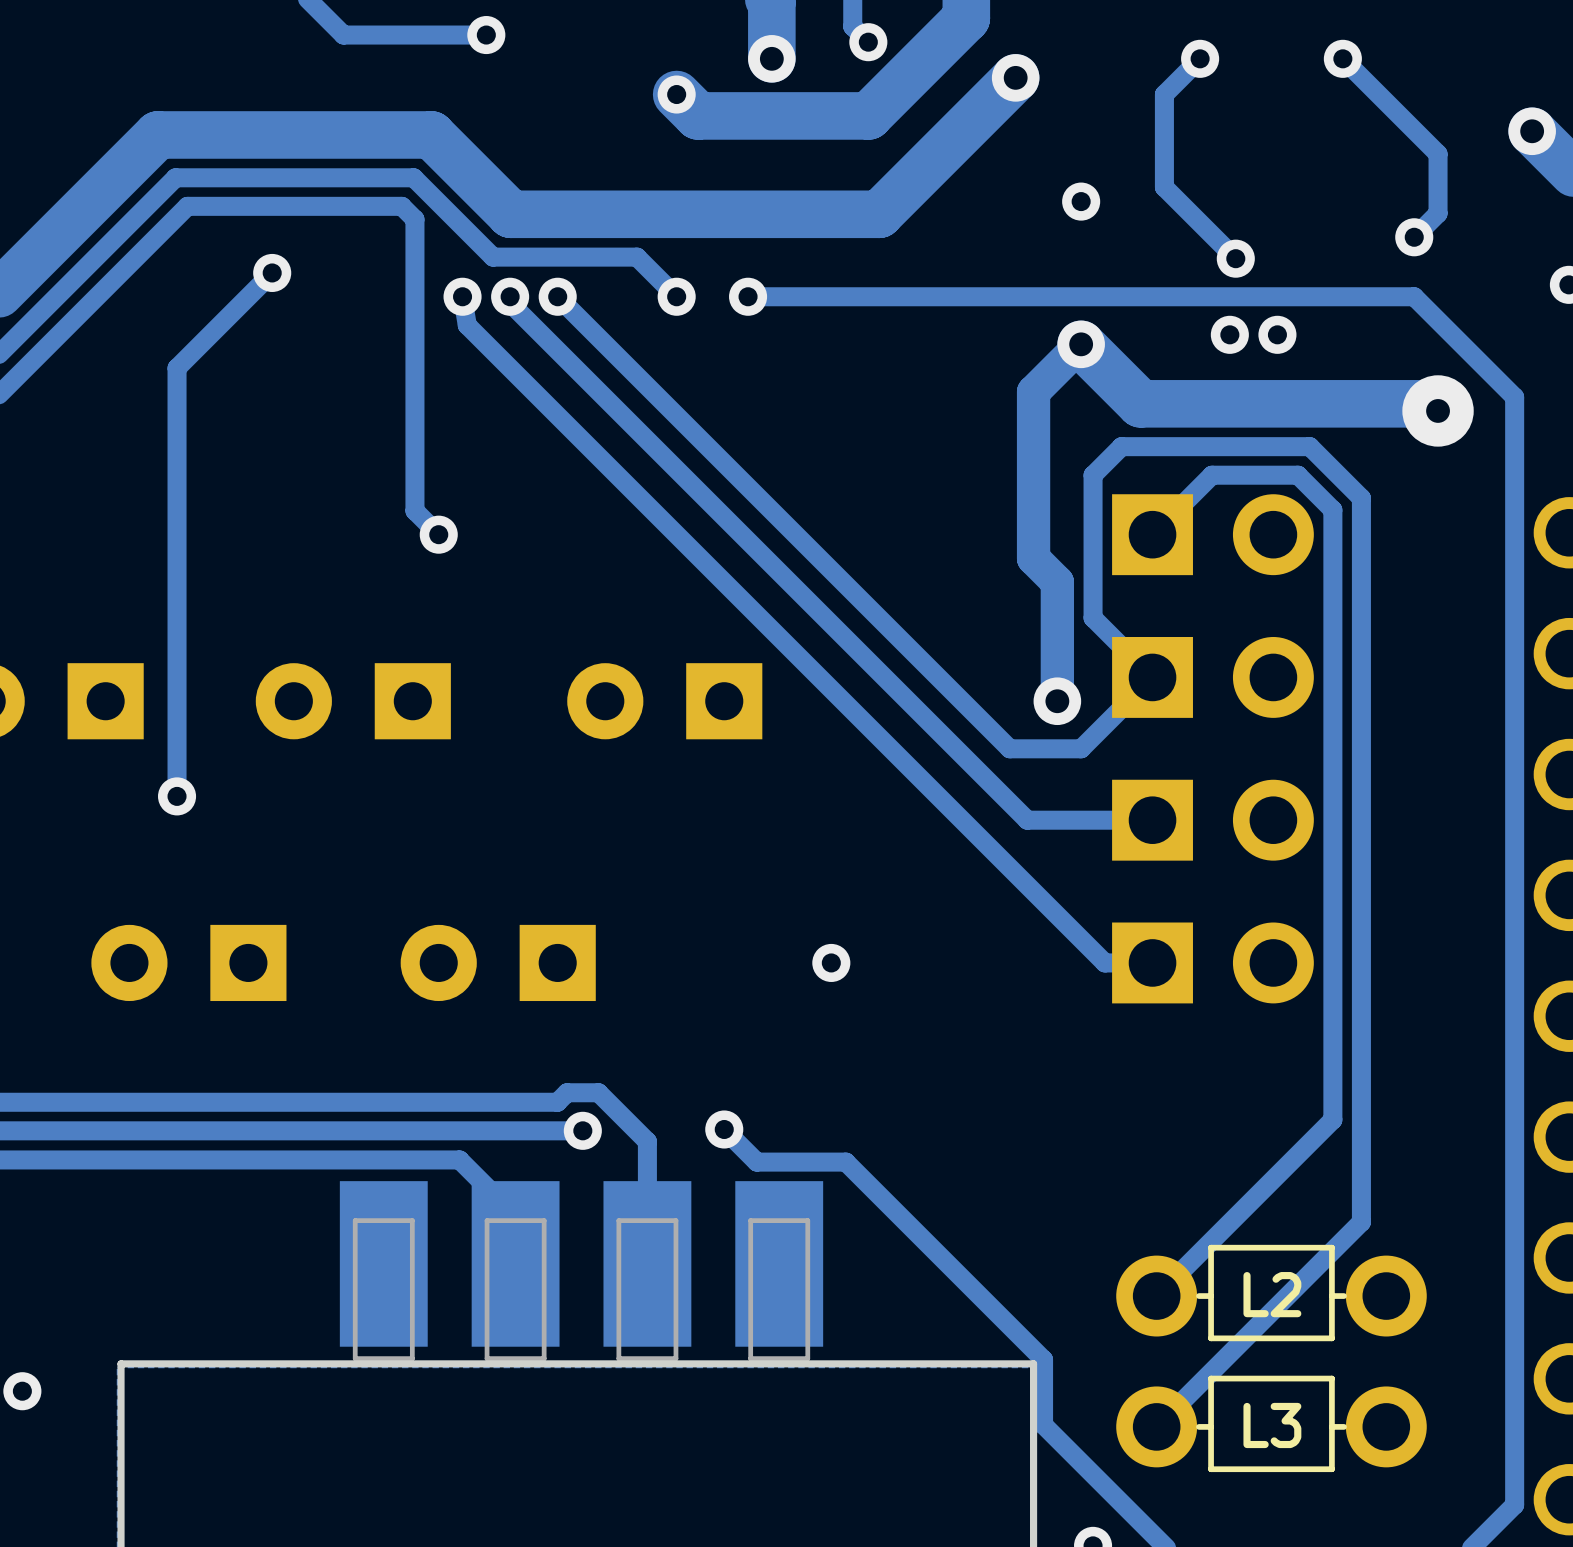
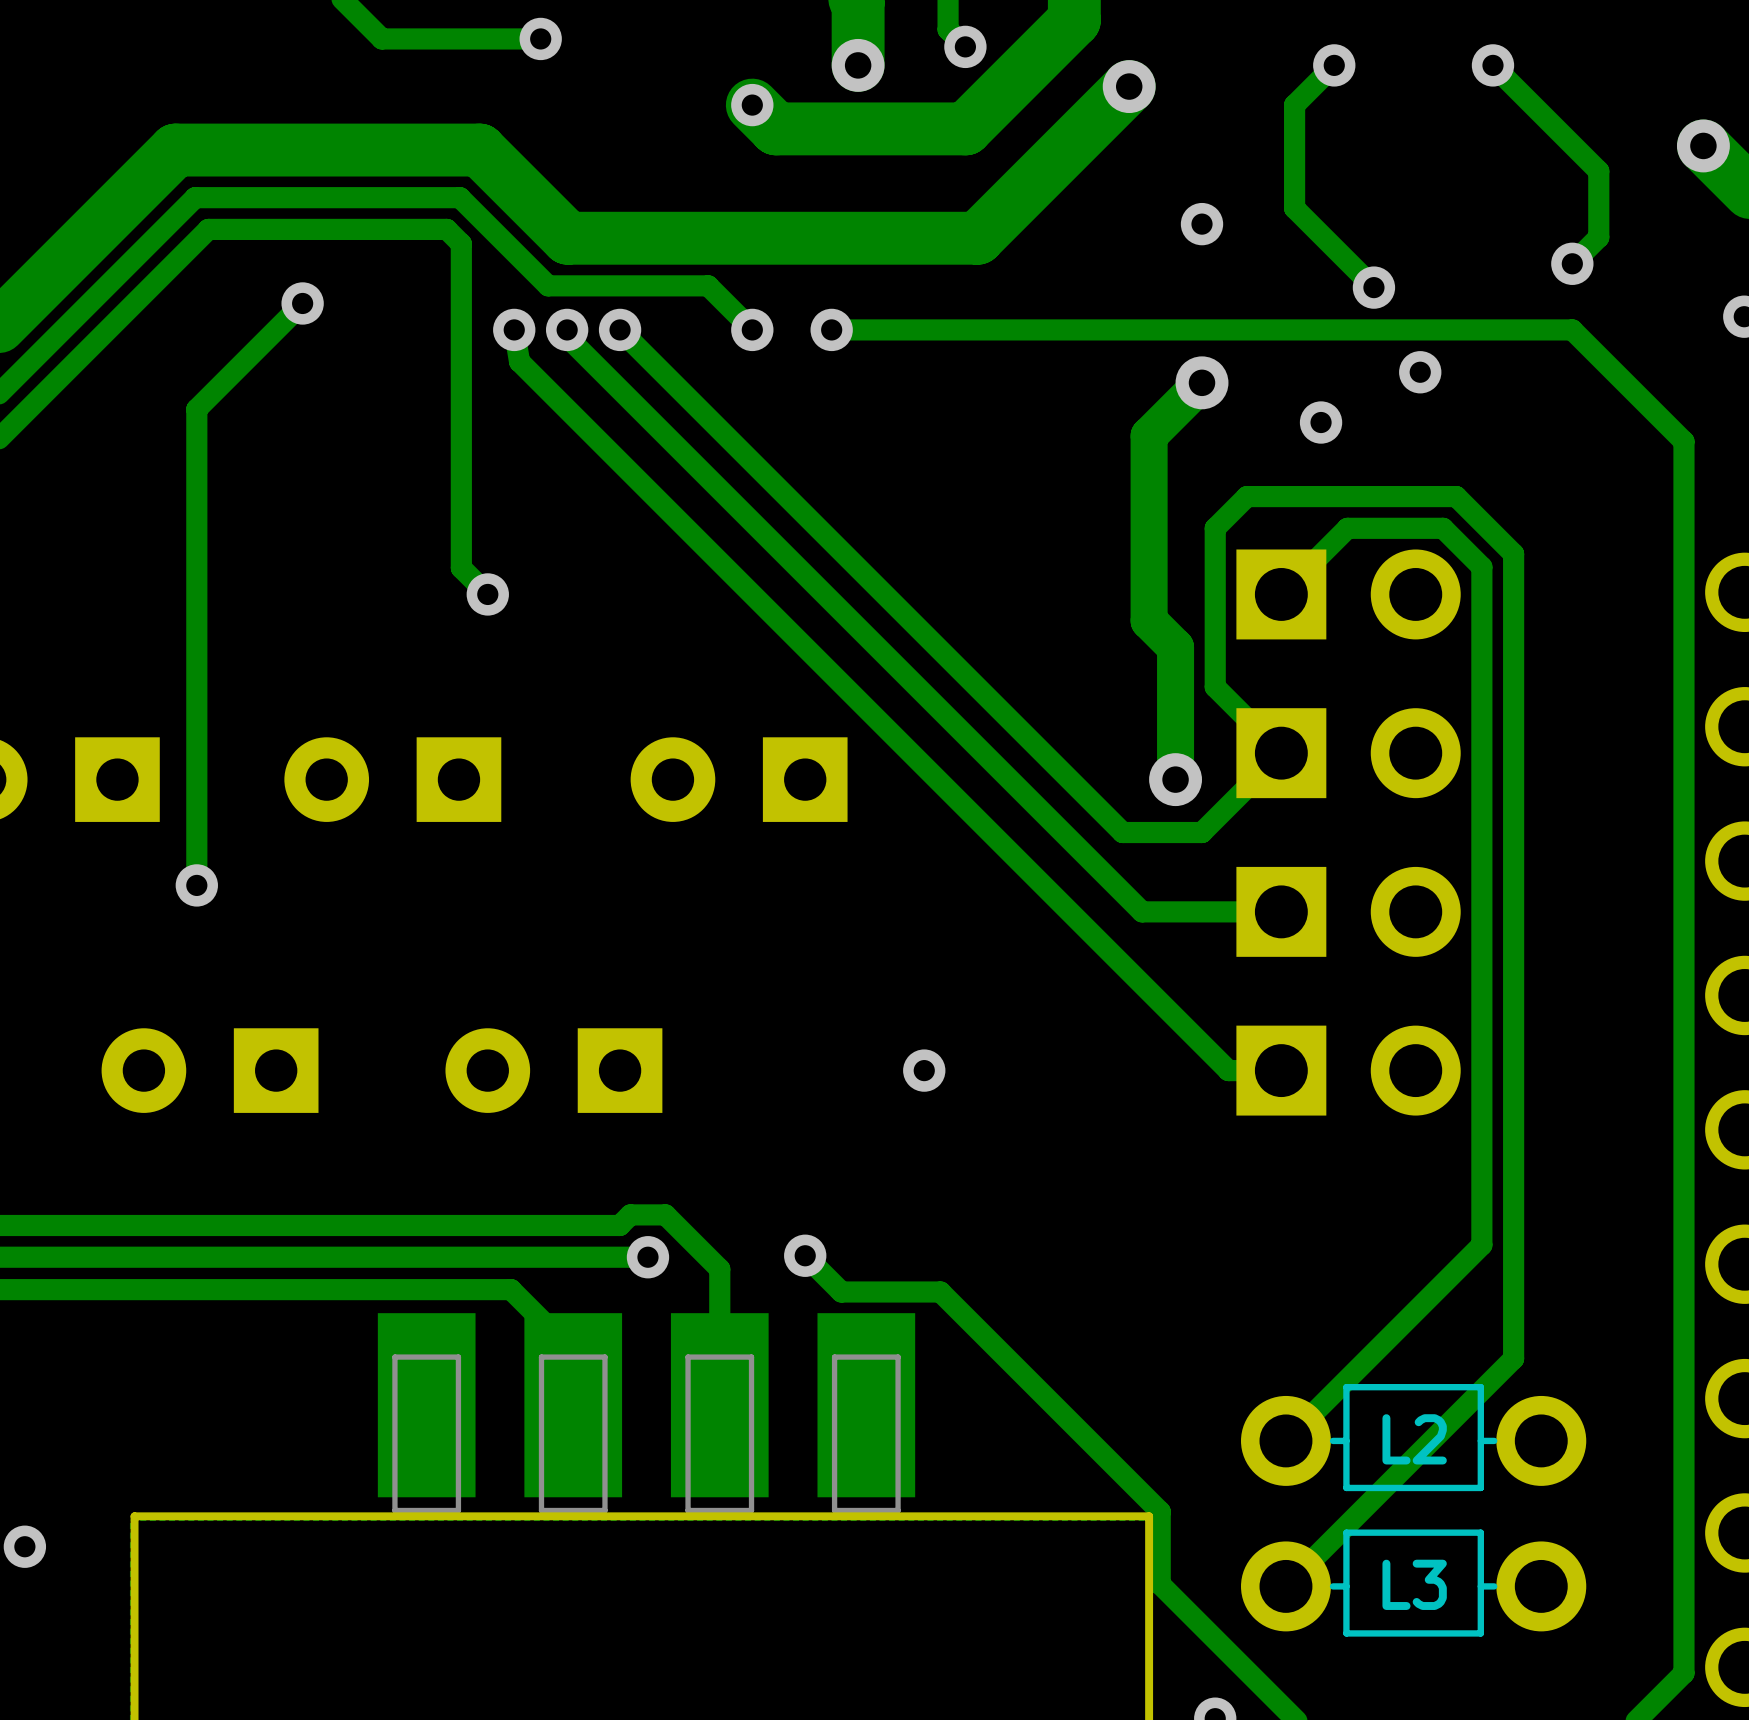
via position: (1229, 334) -> (1321, 422)
track: (1081, 344) (1140, 403) (1430, 403) (1438, 410) -> none
via: (1438, 410) -> none

